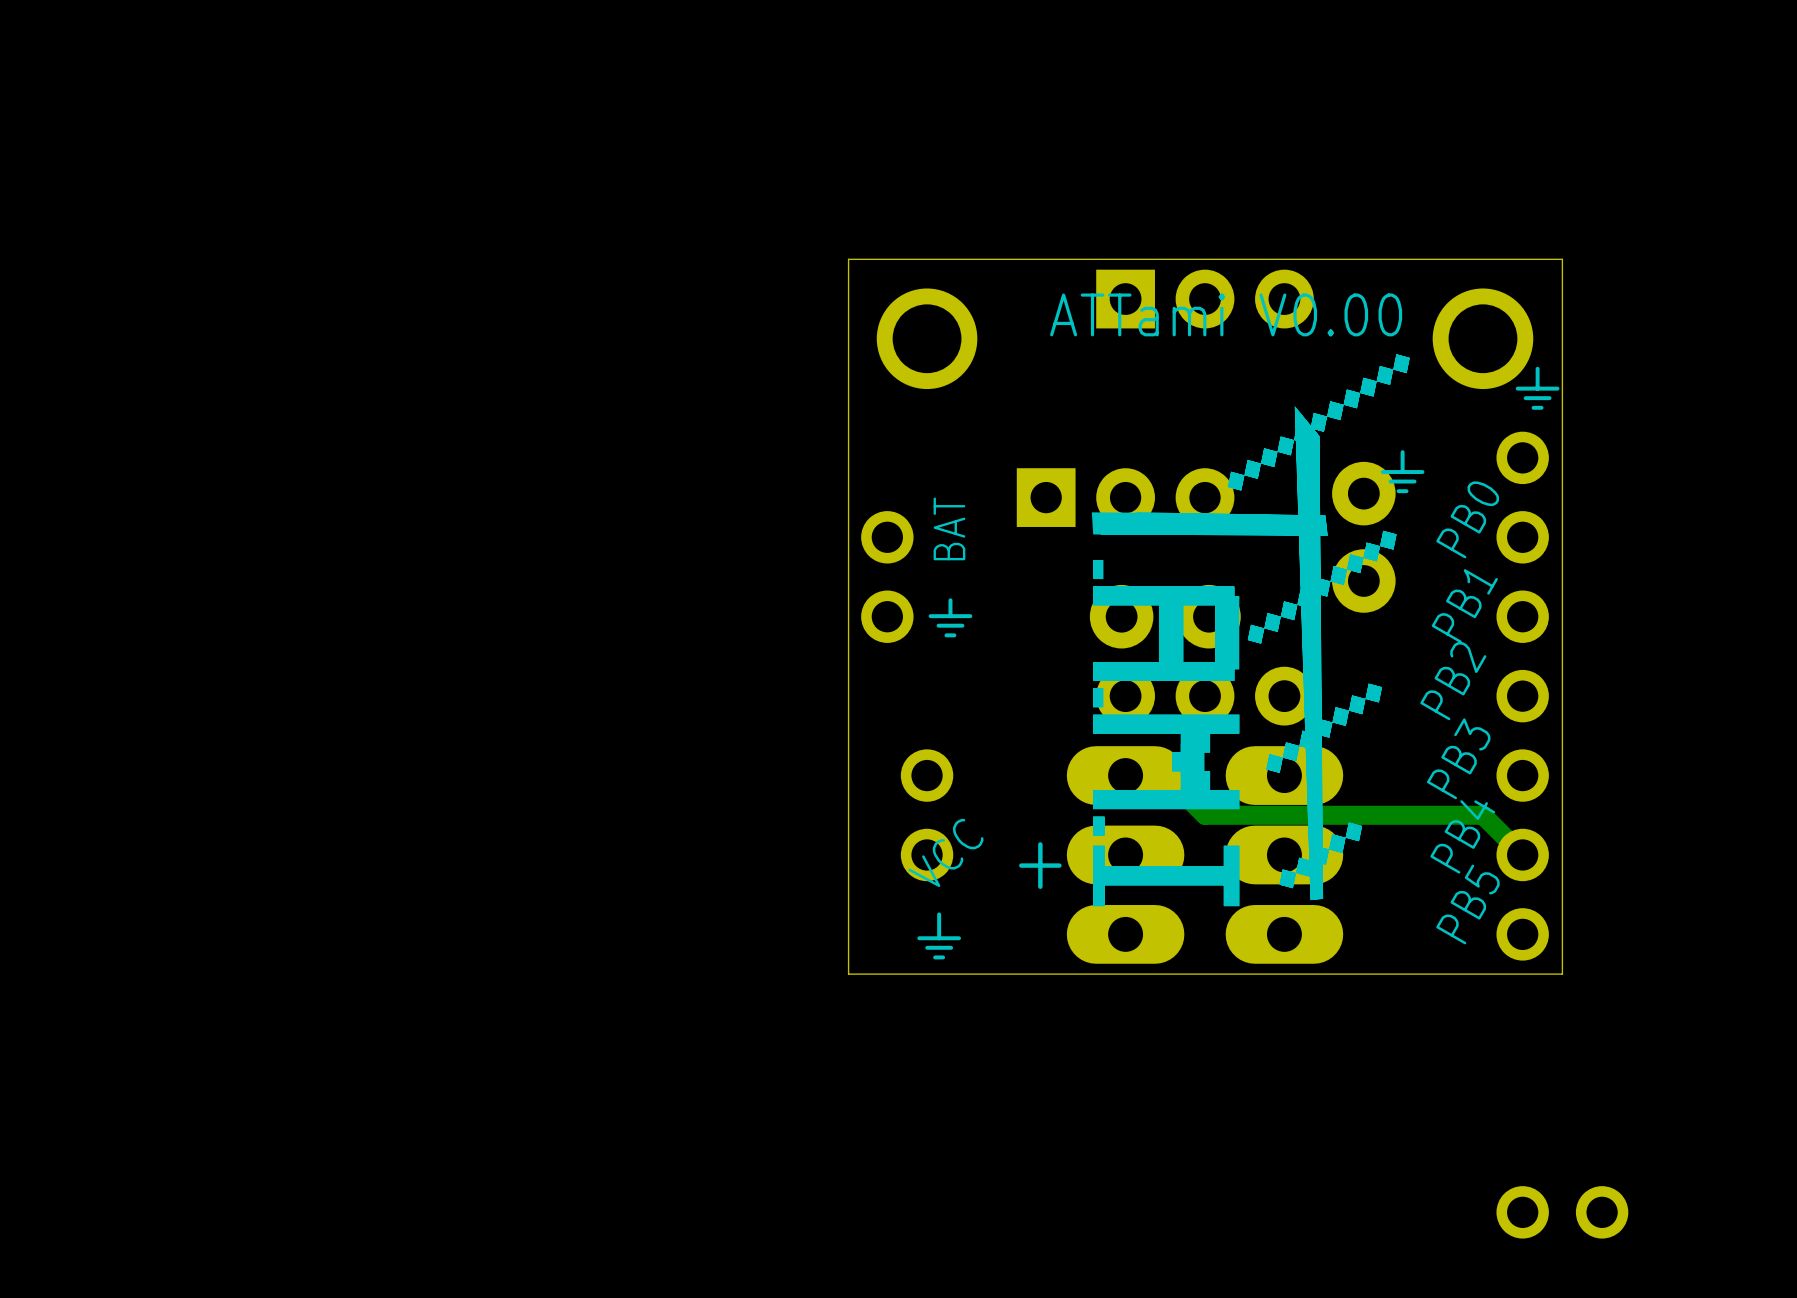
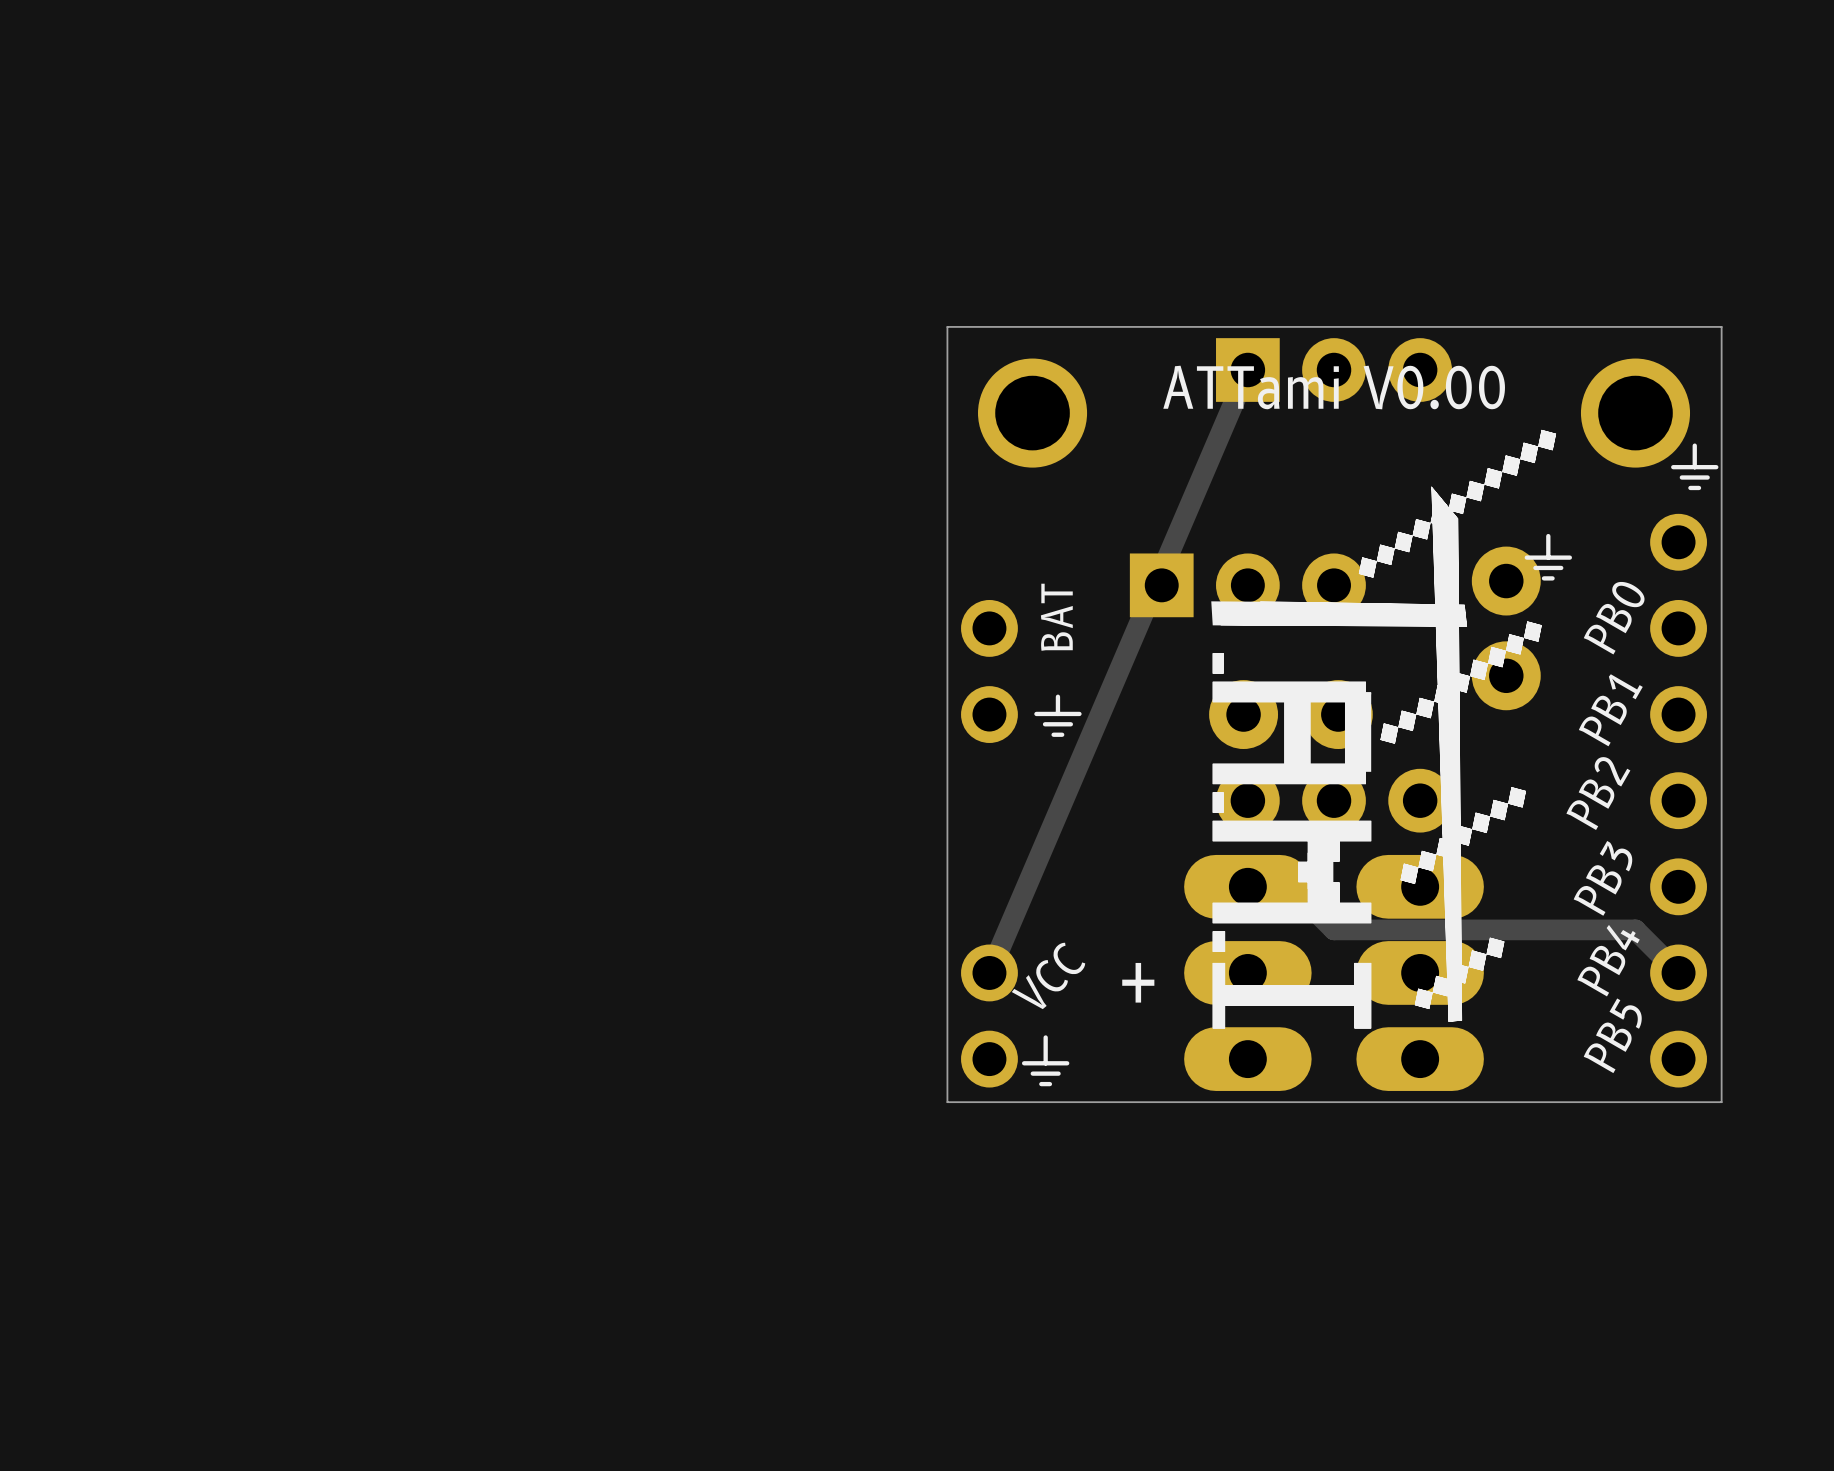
track: none -> (1247, 370) (989, 972)
part position: (927, 815) -> (989, 1016)
part: (1562, 1212) -> none

